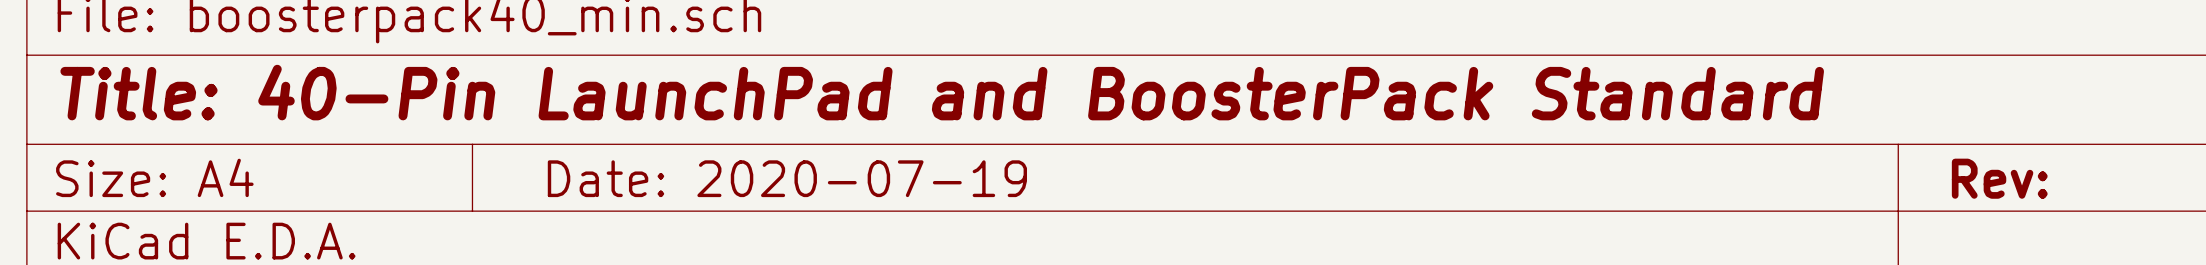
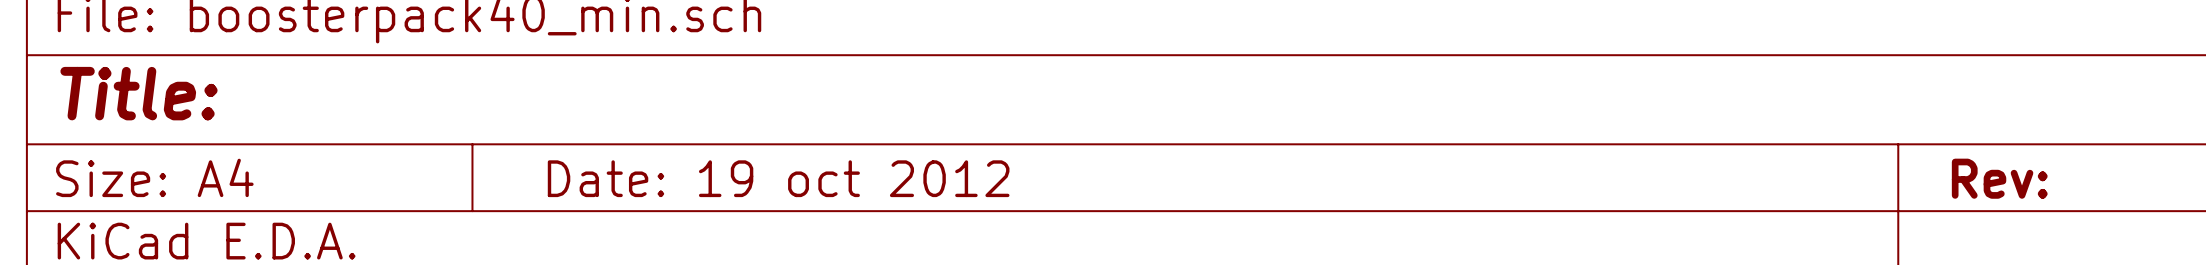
title block: Title: 40-Pin LaunchPad and BoosterPack Standard (942, 92) -> Title: (138, 93)
title block: Date: 2020-07-19 (787, 178) -> Date: 19 oct 2012 (778, 178)

